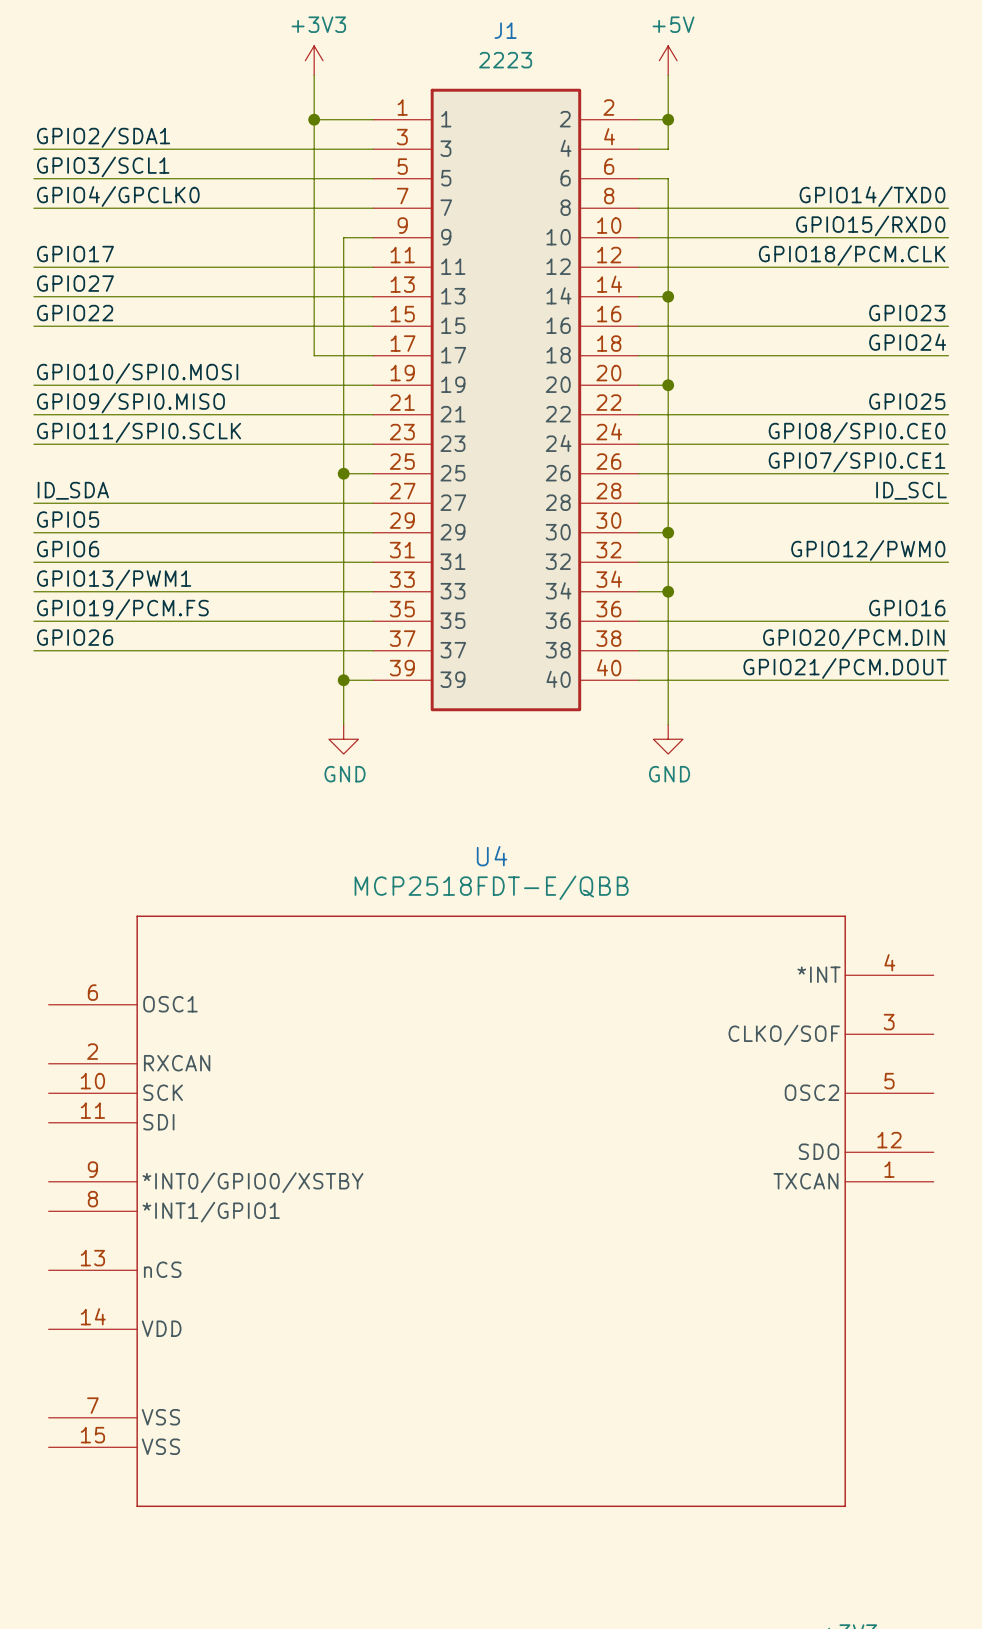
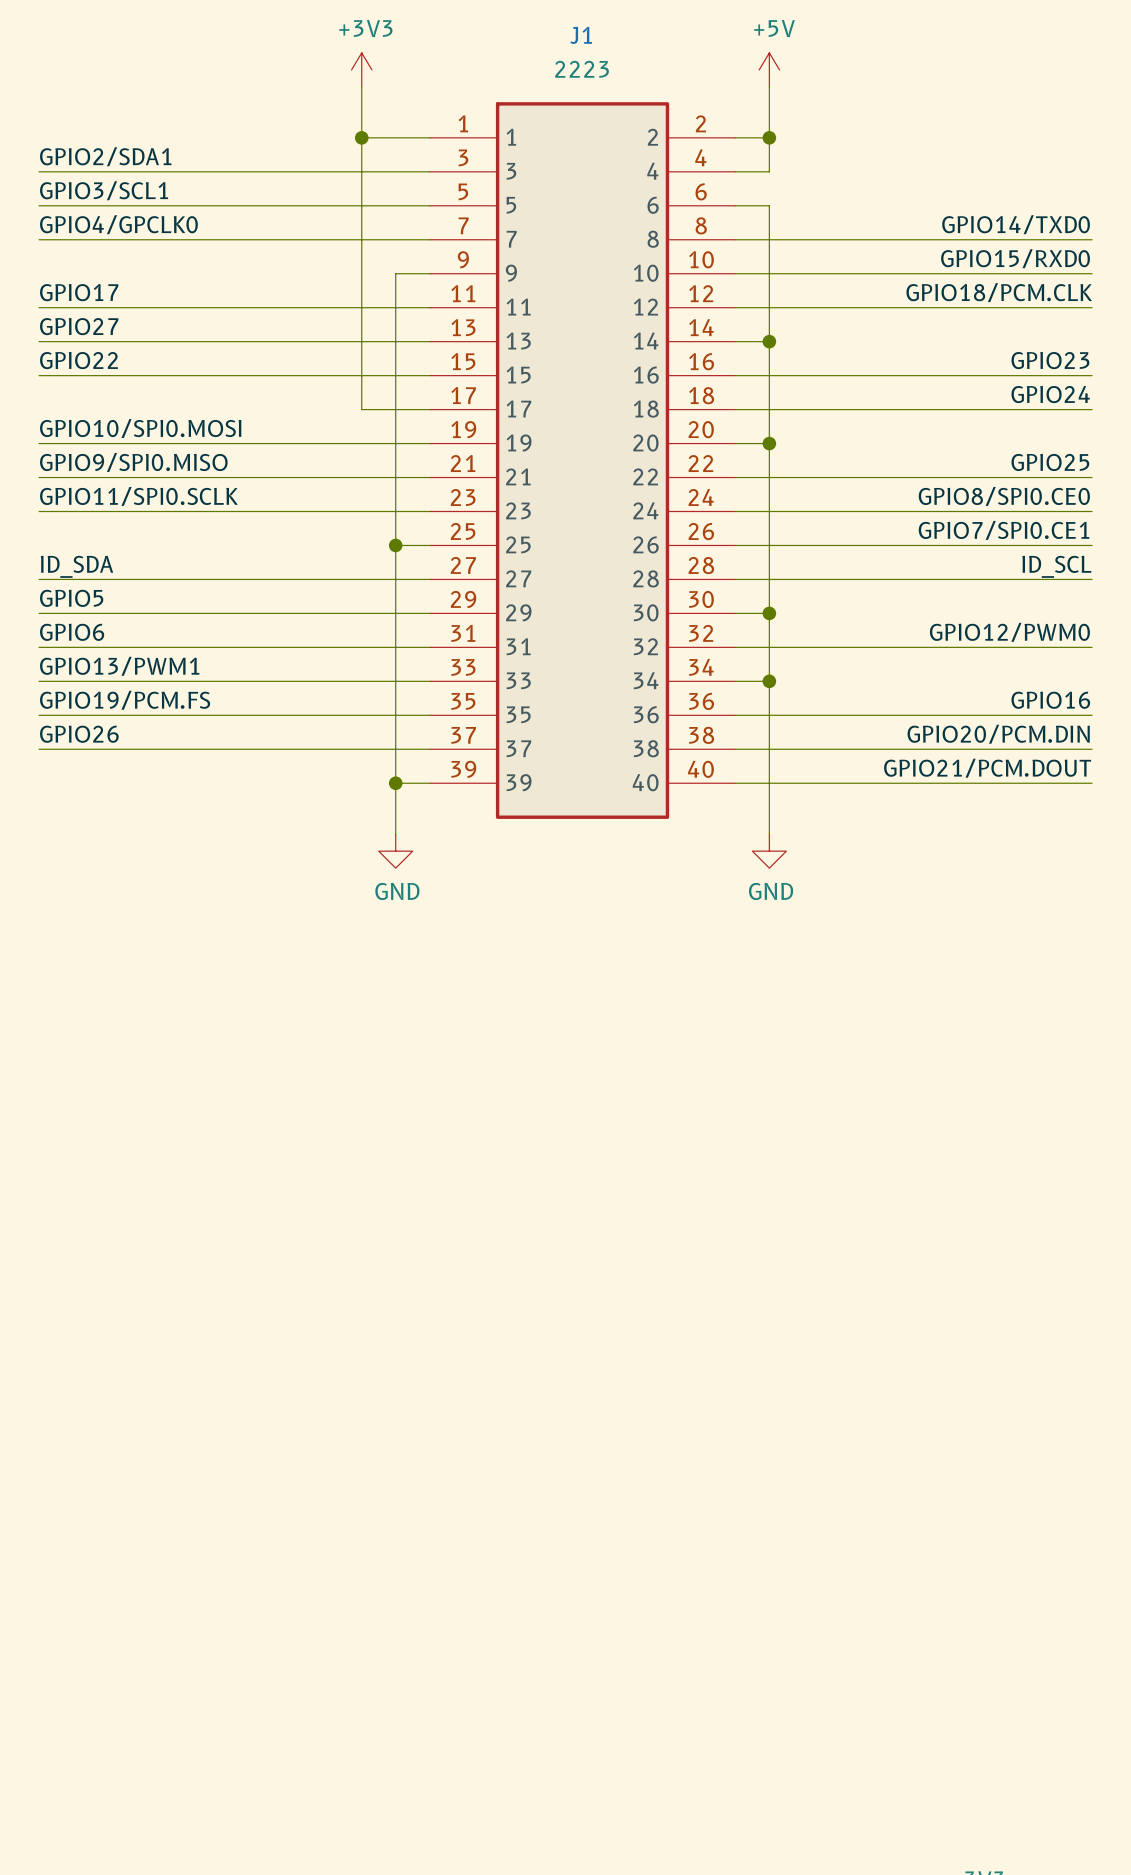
U4: MCP2518FDT-E/QBB (491, 1211) -> none

